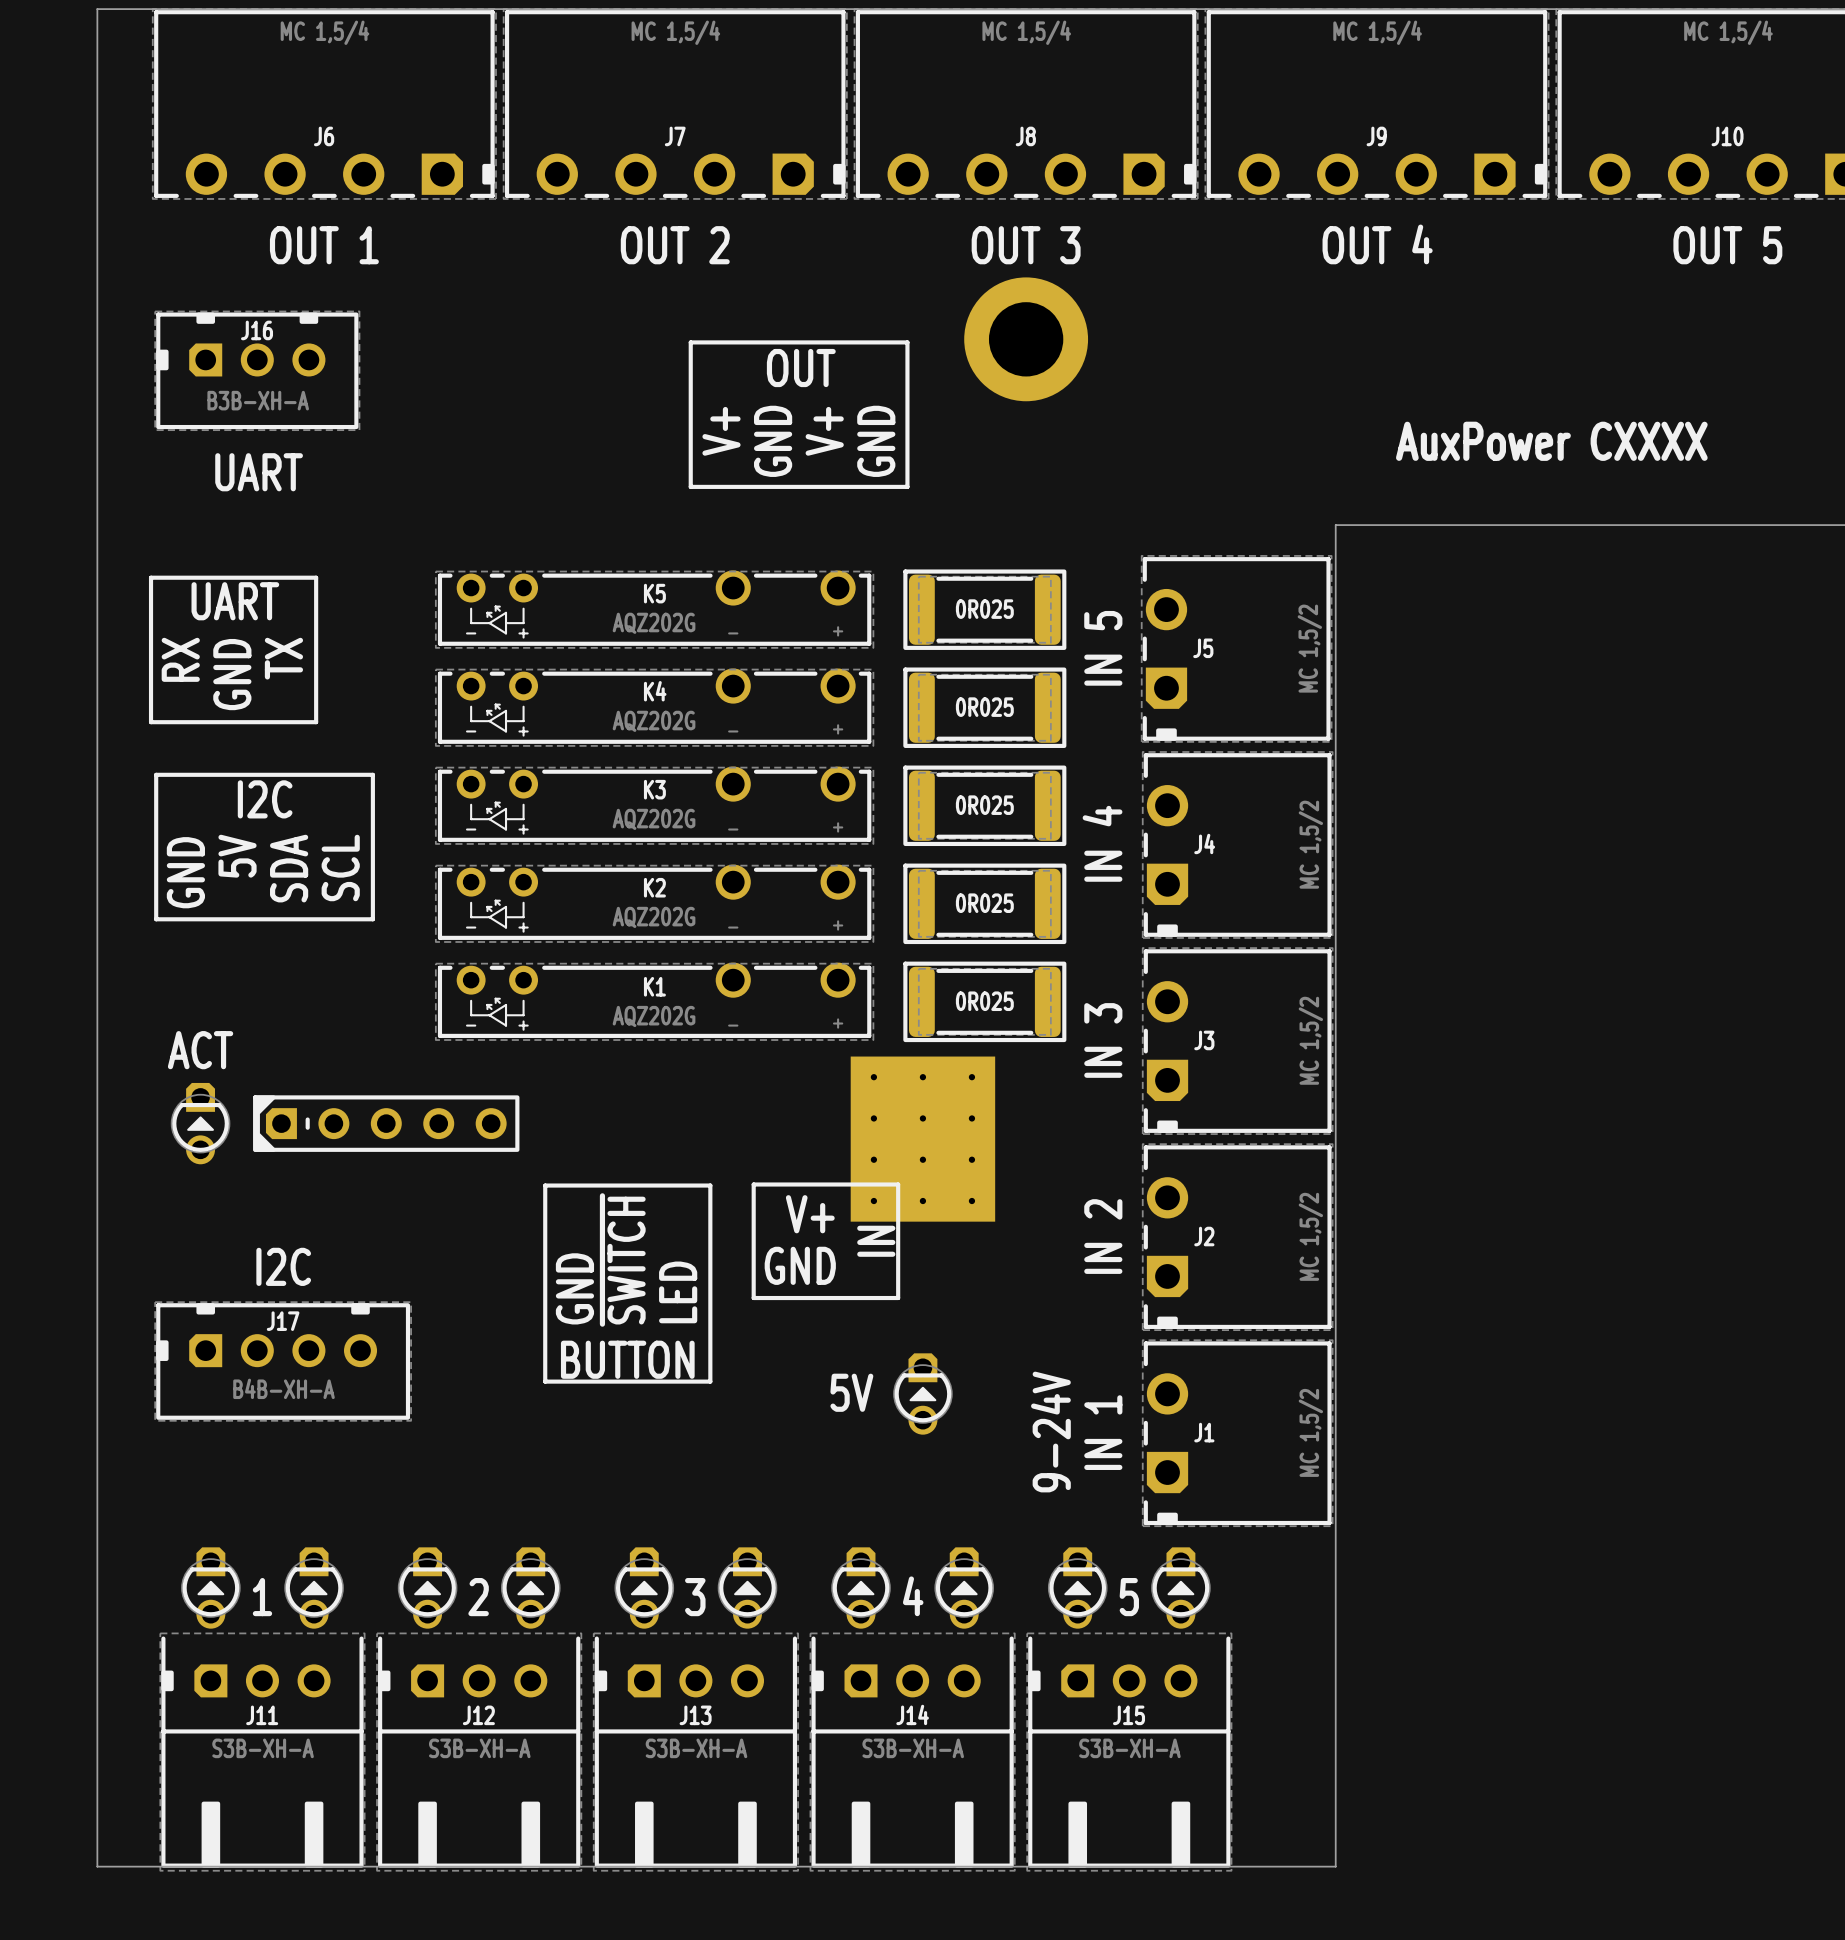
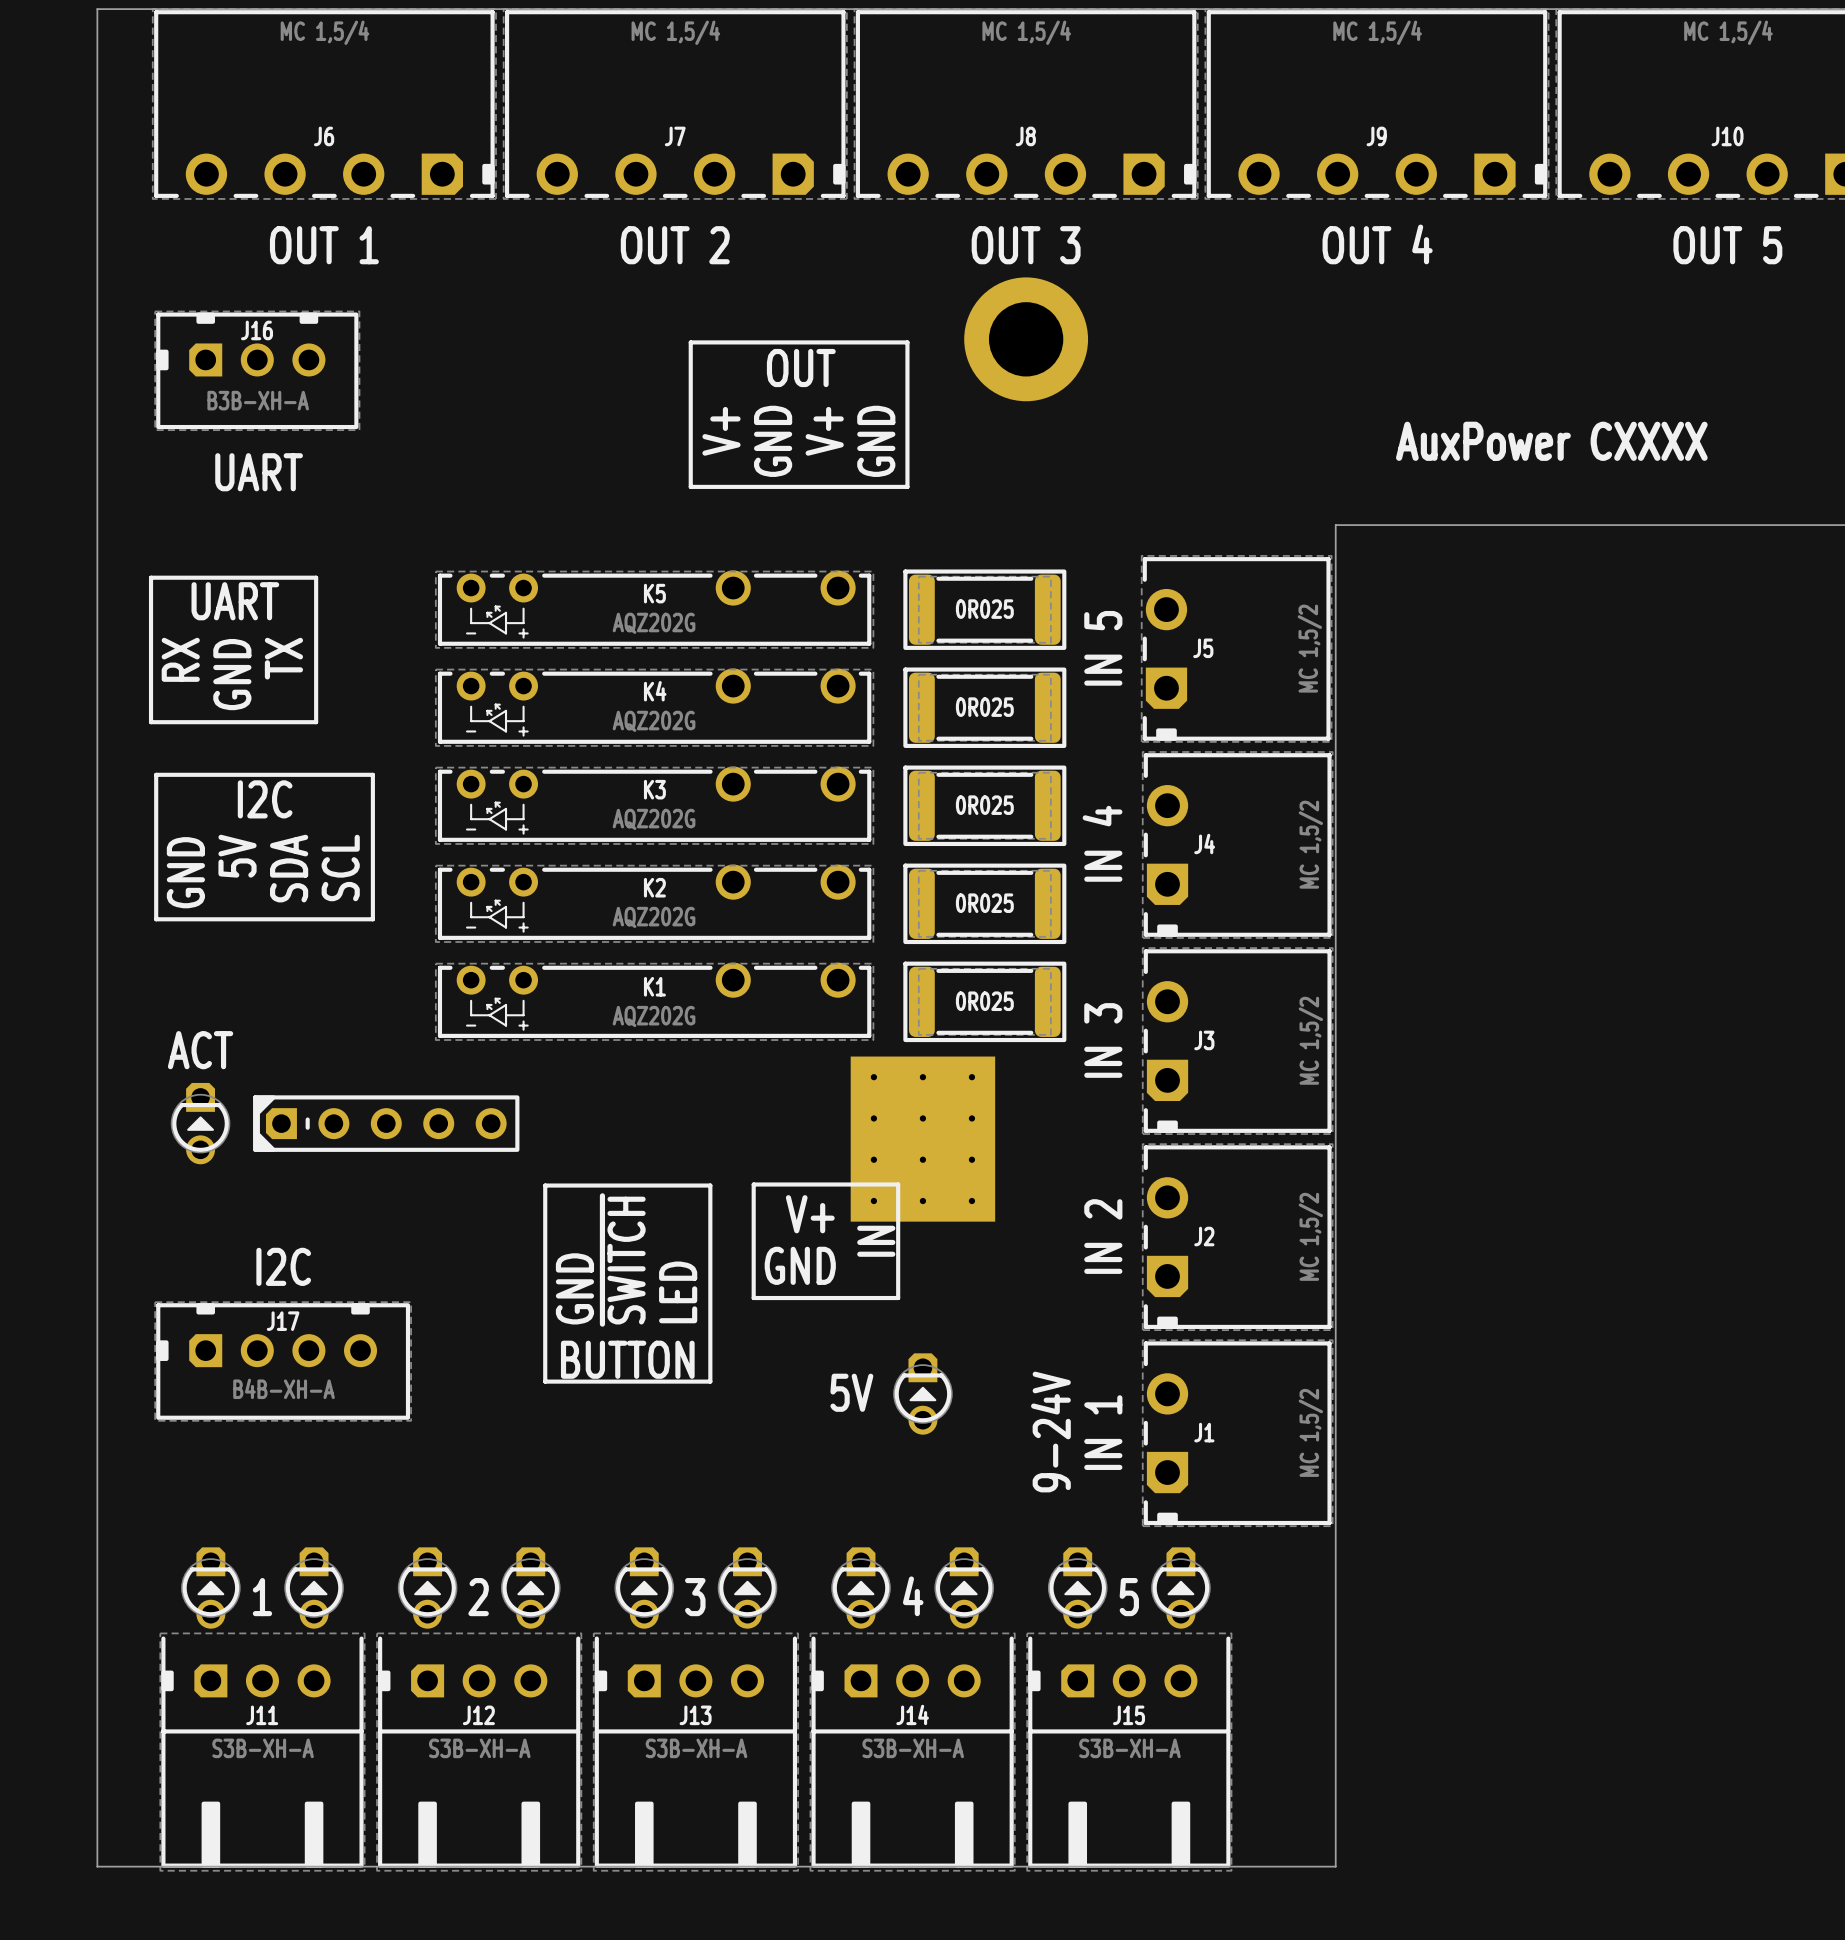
K5 footprint: [435, 570, 874, 648] -> [435, 570, 874, 648]
K4 footprint: [435, 668, 874, 747] -> [435, 668, 874, 747]
K3 footprint: [435, 766, 874, 845] -> [435, 766, 874, 845]
K2 footprint: [435, 864, 874, 943] -> [435, 864, 874, 943]
K1 footprint: [435, 962, 874, 1041] -> [435, 962, 874, 1041]

